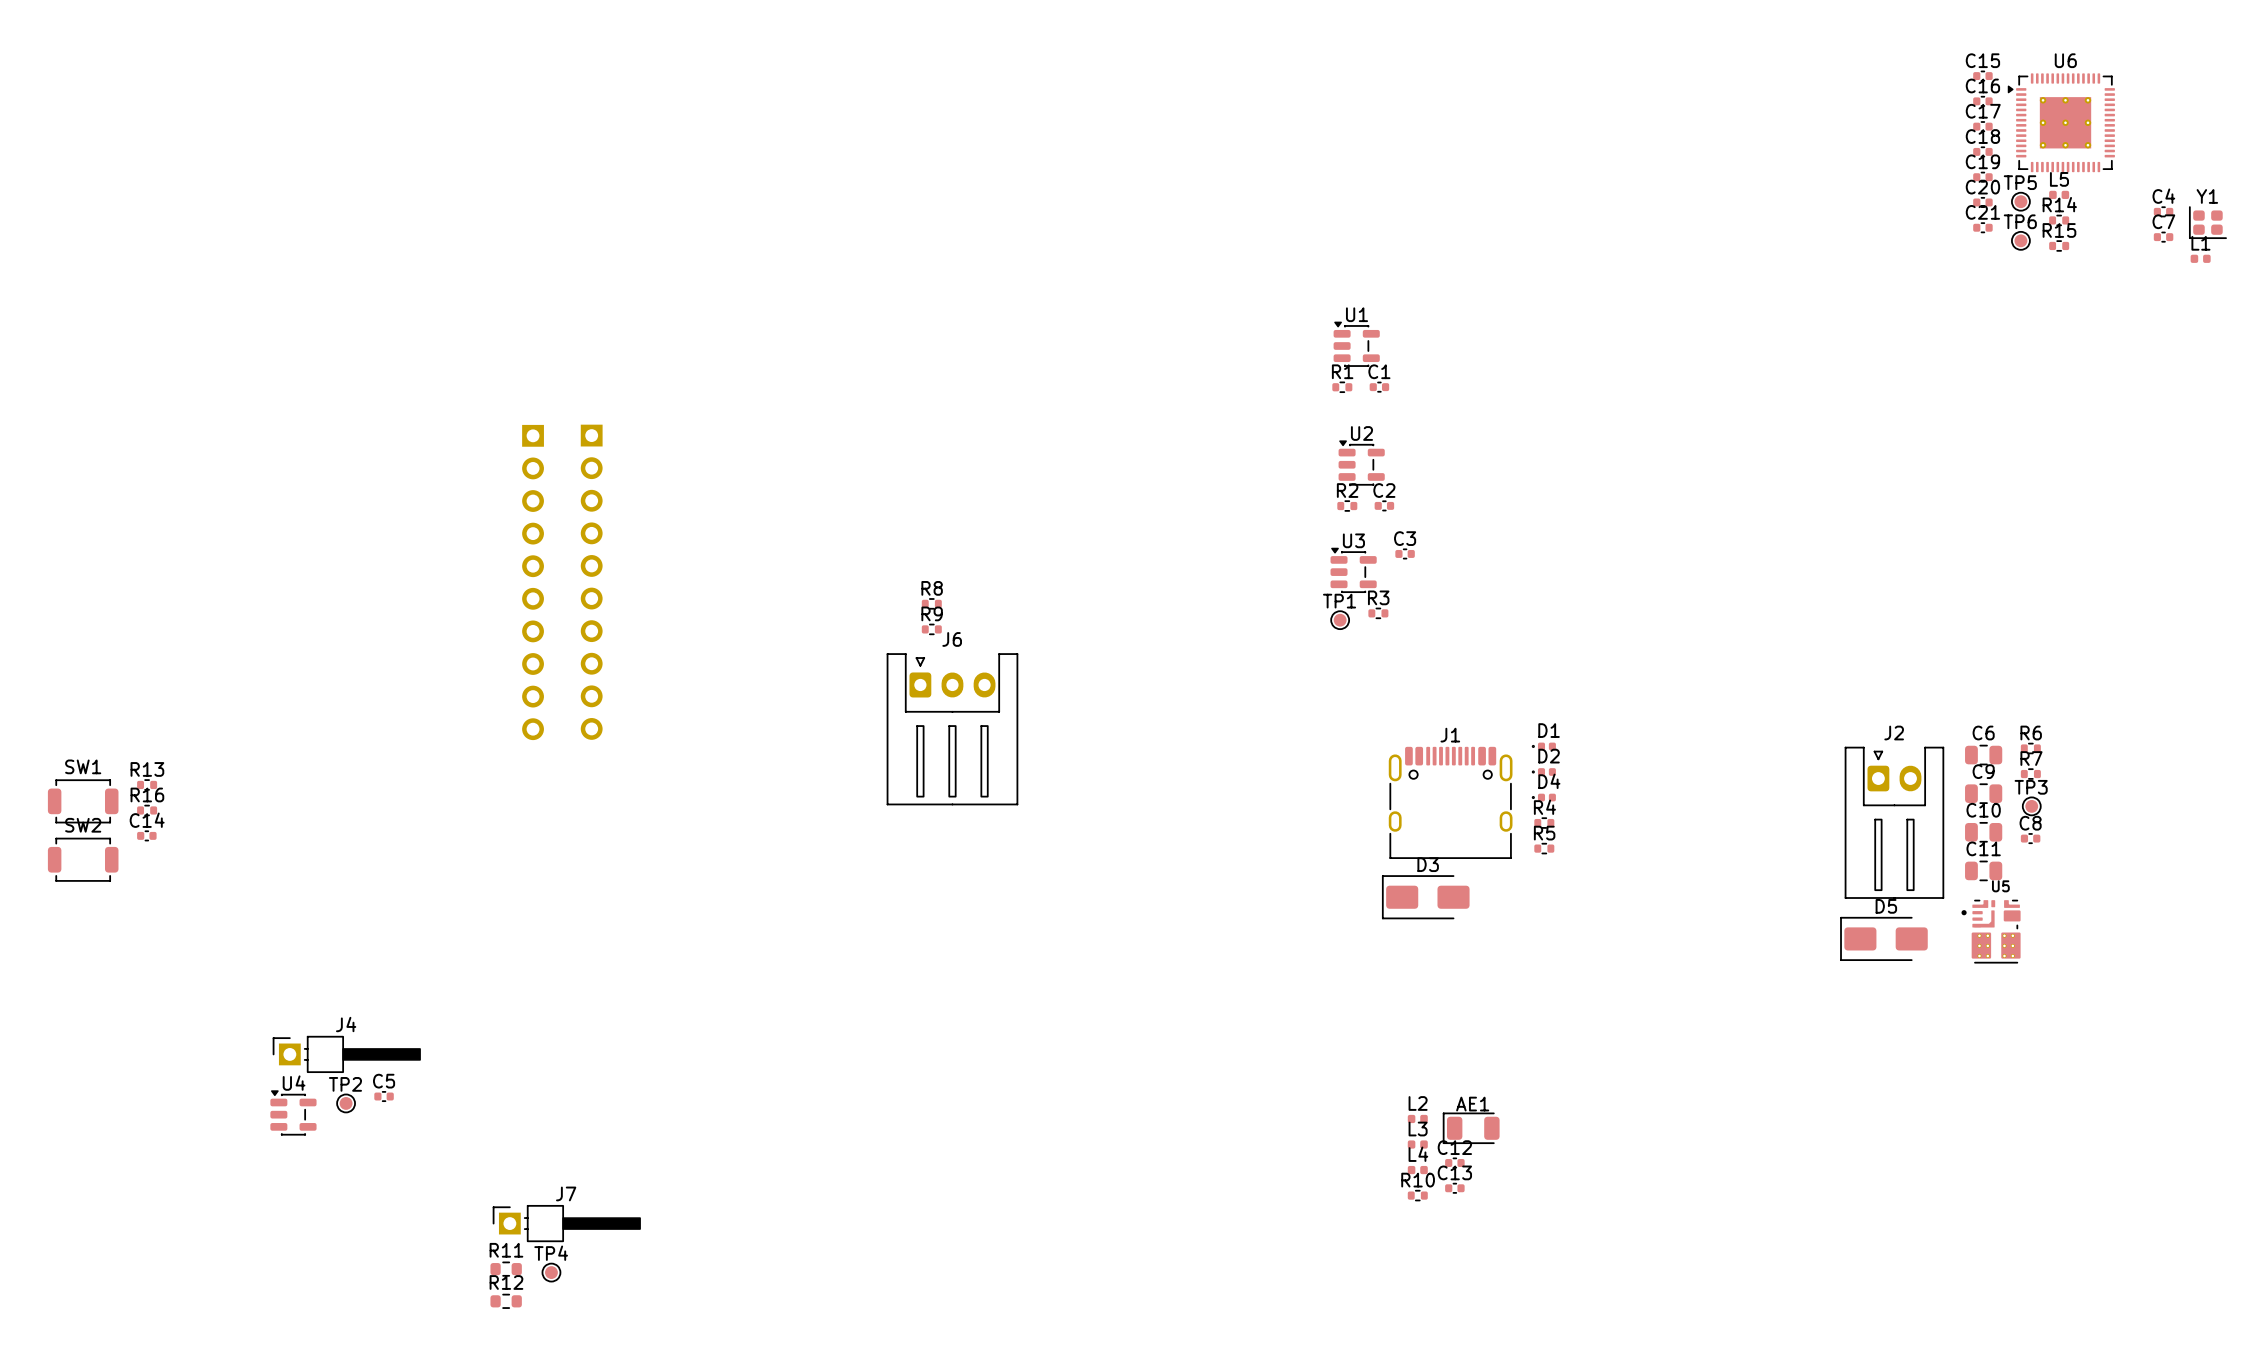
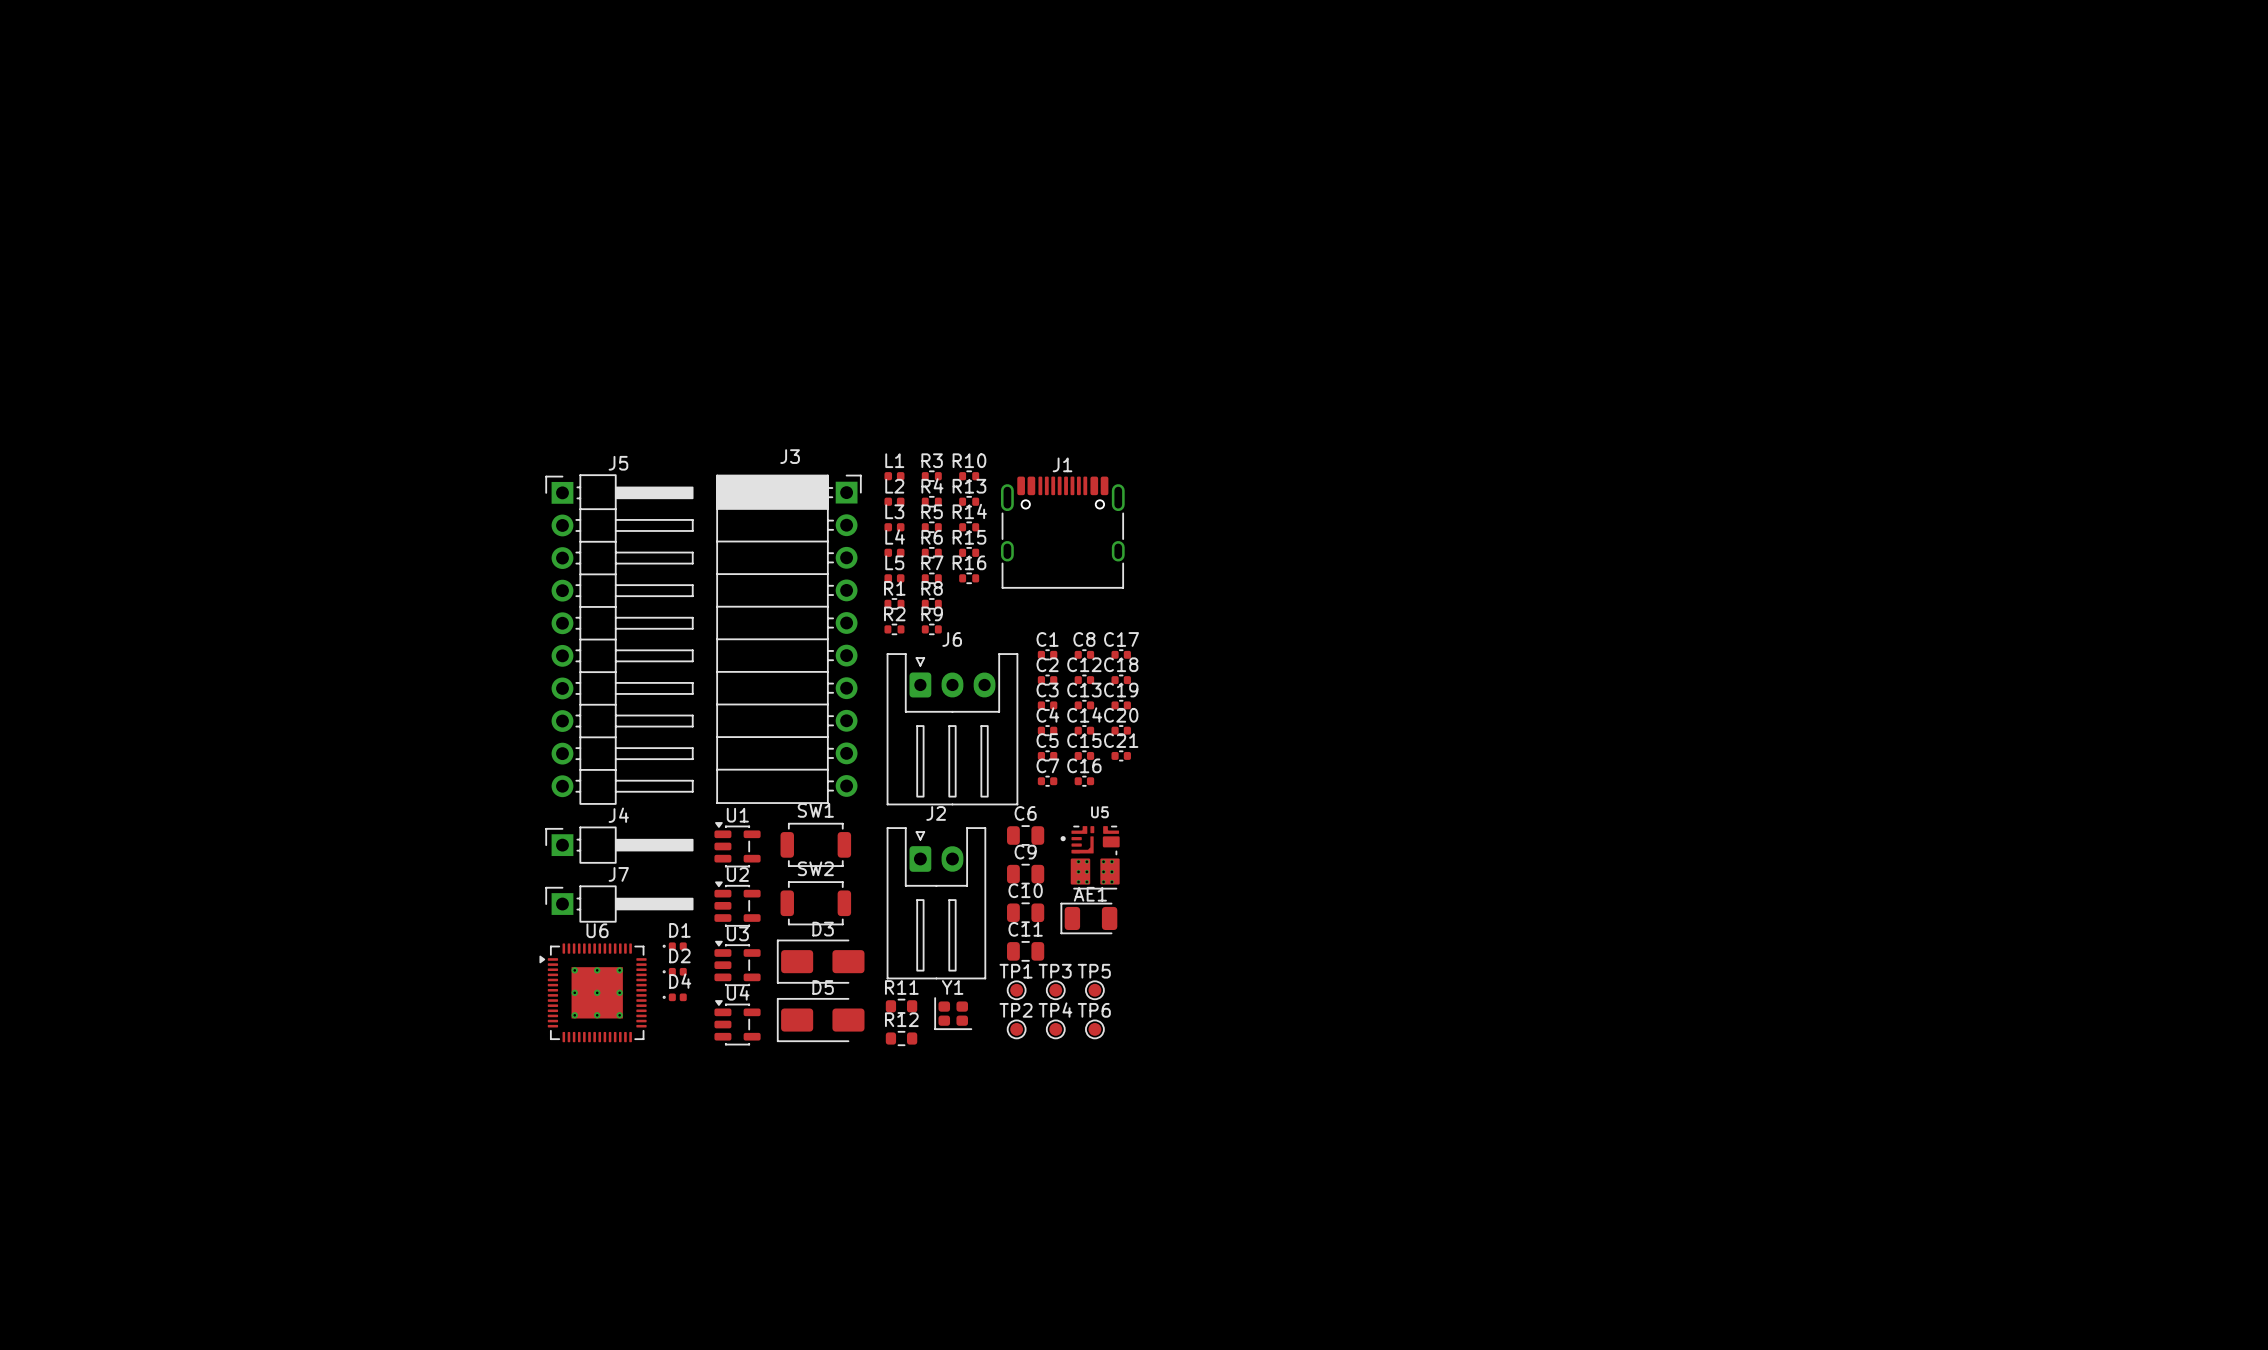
C15 position: (1982, 76) -> (1084, 755)
C16 position: (1982, 101) -> (1084, 781)
U6 position: (2061, 122) -> (593, 992)
C17 position: (1982, 126) -> (1121, 654)
C18 position: (1982, 151) -> (1121, 680)
C19 position: (1982, 177) -> (1121, 705)
L5 position: (2059, 194) -> (894, 578)
TP5 position: (2020, 201) -> (1094, 990)
C20 position: (1982, 202) -> (1121, 730)
C4 position: (2163, 211) -> (1047, 730)
R14 position: (2059, 220) -> (969, 527)
Y1 position: (2207, 222) -> (953, 1013)
C21 position: (1982, 227) -> (1121, 755)
C7 position: (2163, 237) -> (1047, 781)
TP6 position: (2020, 240) -> (1094, 1029)
R15 position: (2059, 245) -> (969, 552)
L1 position: (2200, 258) -> (894, 476)
U1 position: (1356, 344) -> (737, 844)
R1 position: (1342, 387) -> (894, 603)
C1 position: (1379, 387) -> (1047, 654)
U2 position: (1361, 462) -> (737, 904)
C2 position: (1384, 505) -> (1047, 680)
R2 position: (1347, 506) -> (894, 629)
C3 position: (1405, 553) -> (1047, 705)
U3 position: (1353, 570) -> (737, 963)
part: (533, 582) -> none
part: (591, 582) -> none
R3 position: (1378, 613) -> (931, 476)
TP1 position: (1340, 620) -> (1016, 990)
J5: none -> (619, 639)
J3: none -> (788, 639)
D1 position: (1543, 746) -> (674, 946)
R6 position: (2030, 748) -> (931, 552)
C6 position: (1983, 755) -> (1025, 835)
D2 position: (1543, 771) -> (674, 971)
R7 position: (2030, 774) -> (931, 578)
R13 position: (147, 784) -> (969, 501)
C9 position: (1983, 793) -> (1025, 874)
D4 position: (1543, 797) -> (674, 997)
SW1 position: (83, 801) -> (815, 844)
J1 position: (1450, 802) -> (1062, 532)
TP3 position: (2031, 806) -> (1055, 990)
R16 position: (147, 810) -> (969, 578)
J2 position: (1894, 822) -> (936, 903)
R4 position: (1544, 823) -> (931, 501)
C10 position: (1983, 832) -> (1025, 912)
C14 position: (146, 835) -> (1084, 730)
C8 position: (2030, 838) -> (1084, 654)
R5 position: (1544, 848) -> (931, 527)
SW2 position: (83, 859) -> (815, 903)
C11 position: (1983, 870) -> (1025, 951)
D3 position: (1425, 897) -> (820, 961)
U5 position: (1991, 931) -> (1090, 857)
D5 position: (1883, 938) -> (820, 1020)
J4 position: (346, 1054) -> (619, 845)
C5 position: (384, 1096) -> (1047, 755)
TP2 position: (346, 1103) -> (1016, 1029)
U4 position: (293, 1112) -> (737, 1022)
L2 position: (1417, 1118) -> (894, 501)
AE1 position: (1471, 1128) -> (1088, 918)
L3 position: (1417, 1144) -> (894, 527)
C12 position: (1454, 1162) -> (1084, 680)
L4 position: (1417, 1170) -> (894, 552)
C13 position: (1454, 1188) -> (1084, 705)
R10 position: (1417, 1195) -> (969, 476)
J7 position: (566, 1223) -> (619, 904)
R11 position: (506, 1269) -> (901, 1006)
TP4 position: (551, 1272) -> (1055, 1029)
R12 position: (506, 1301) -> (901, 1038)

